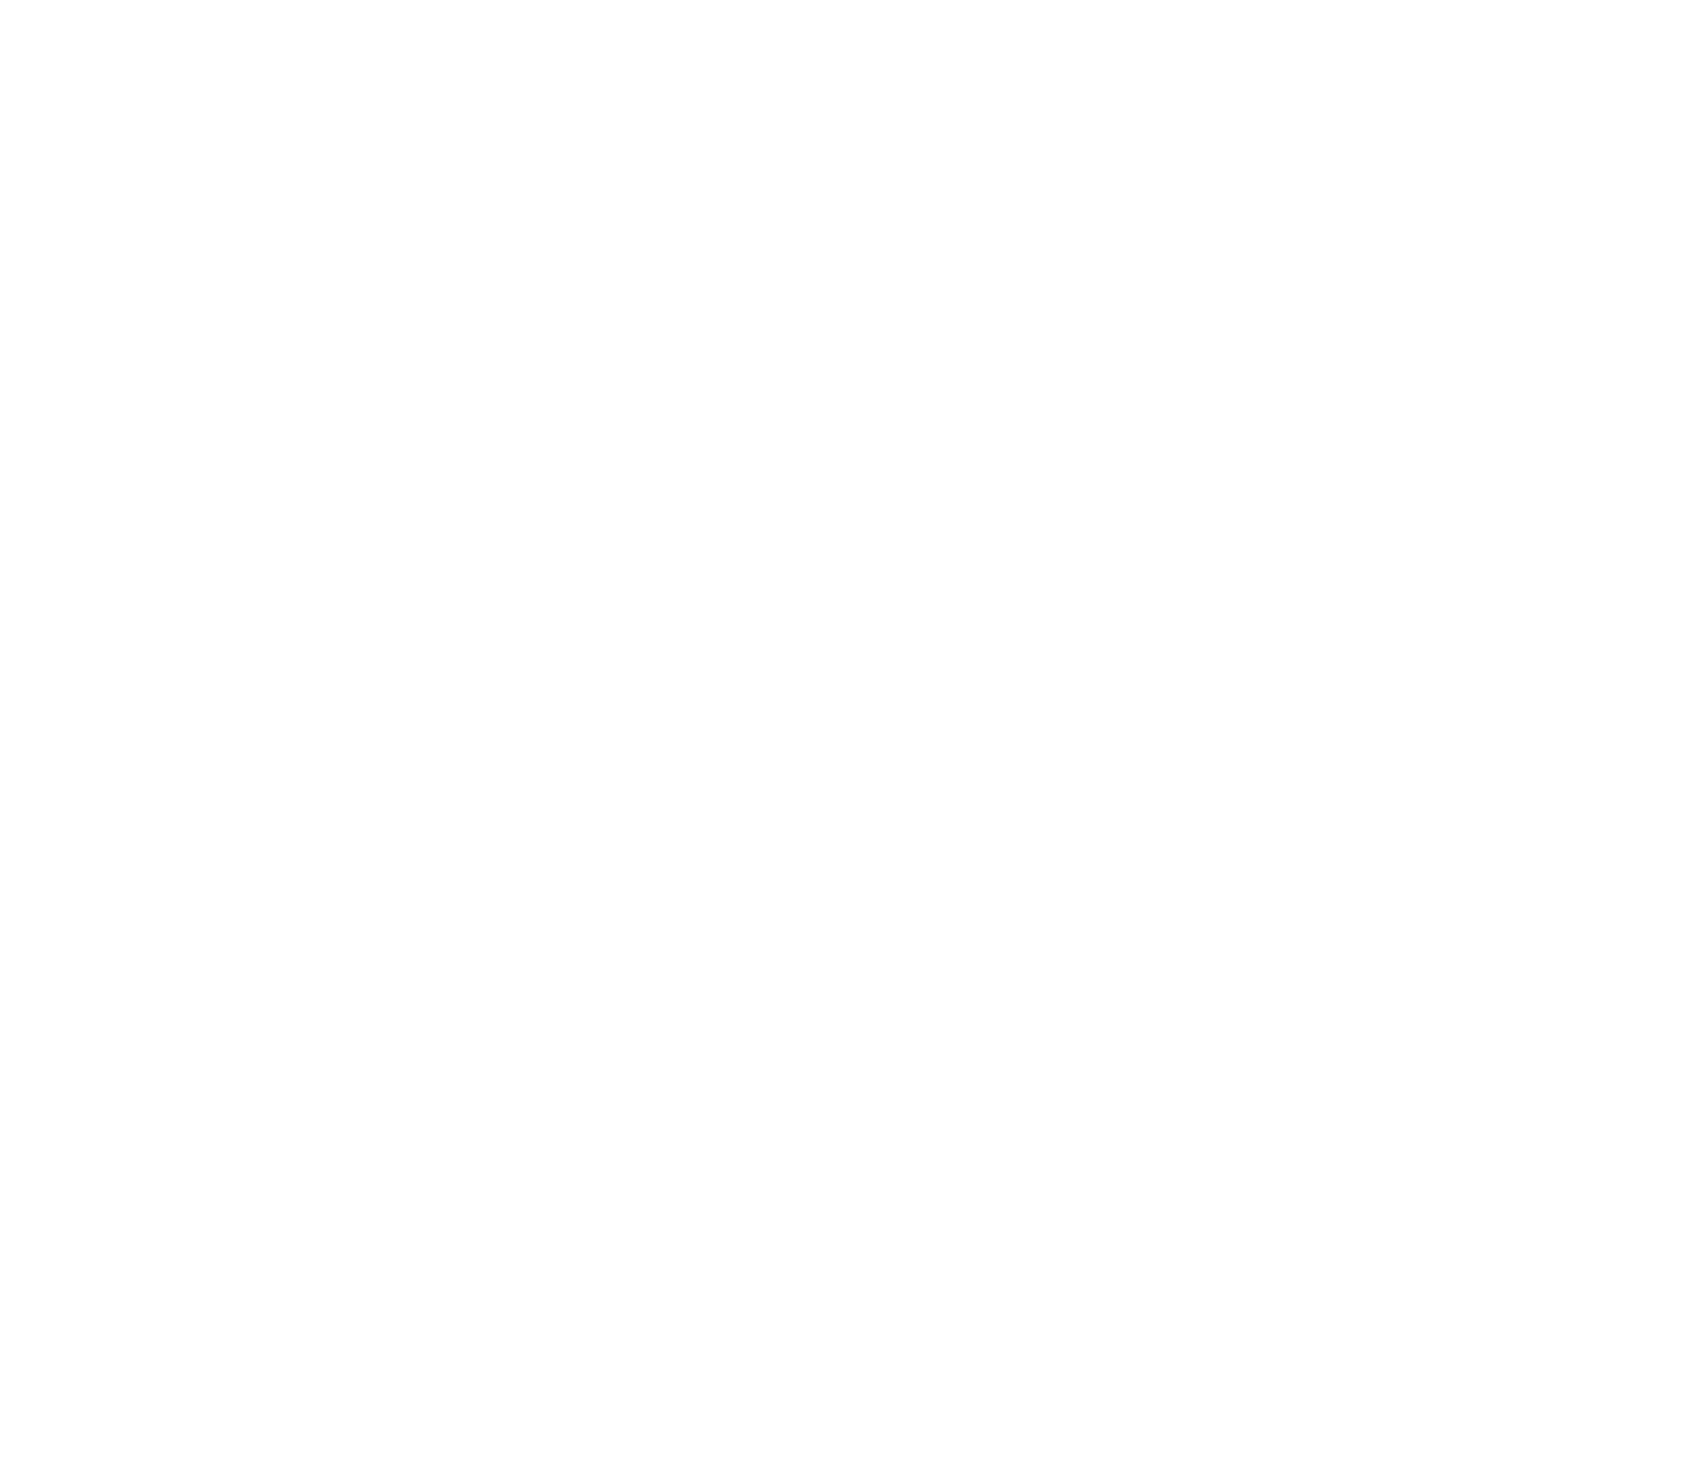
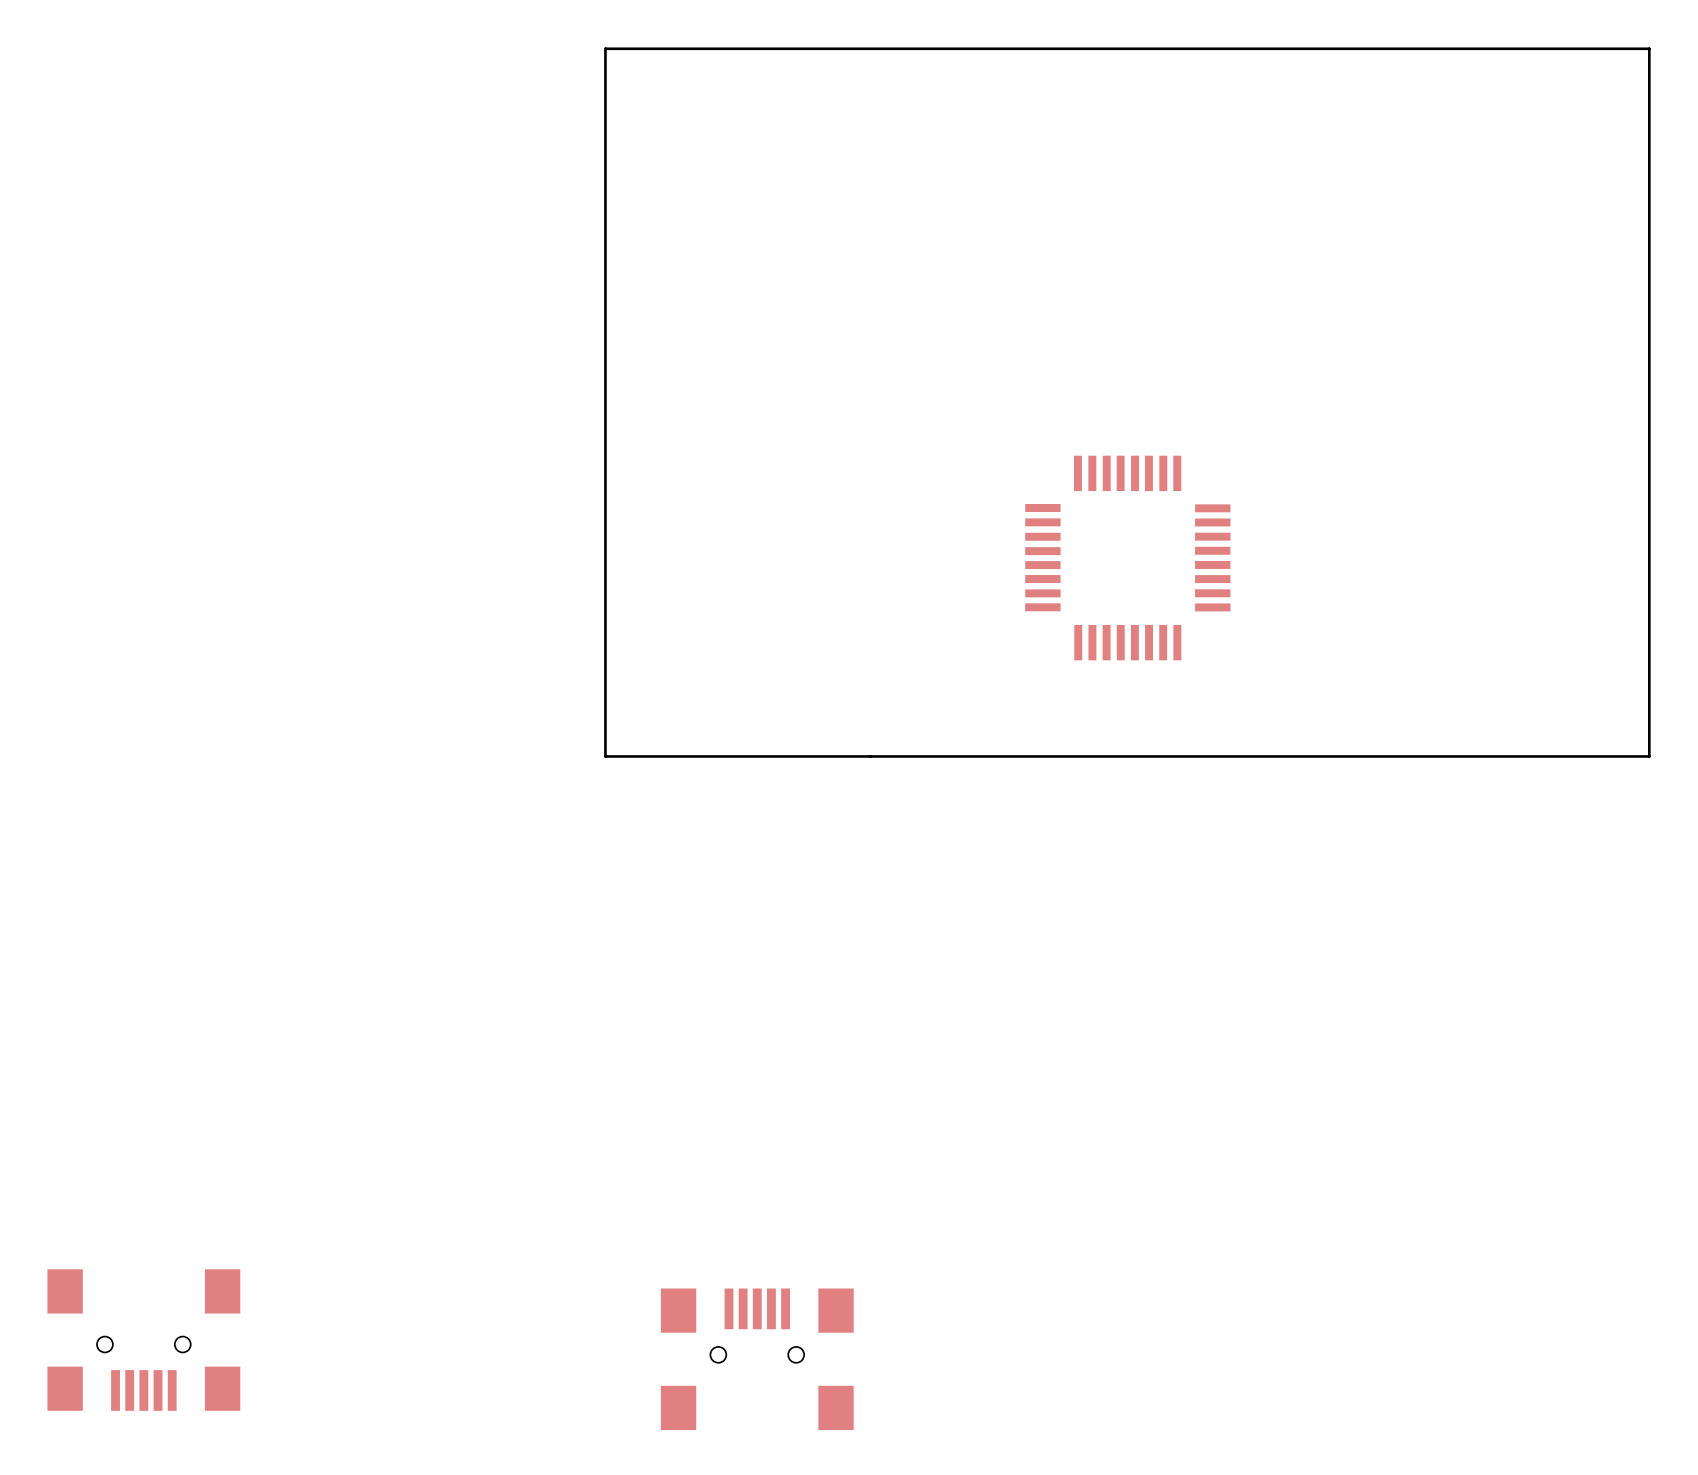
board edge: none -> (1649, 48) (1649, 756) (605, 756) (605, 48) (1649, 48)
part: none -> (1127, 558)
part: none -> (143, 1340)
part: none -> (757, 1359)

